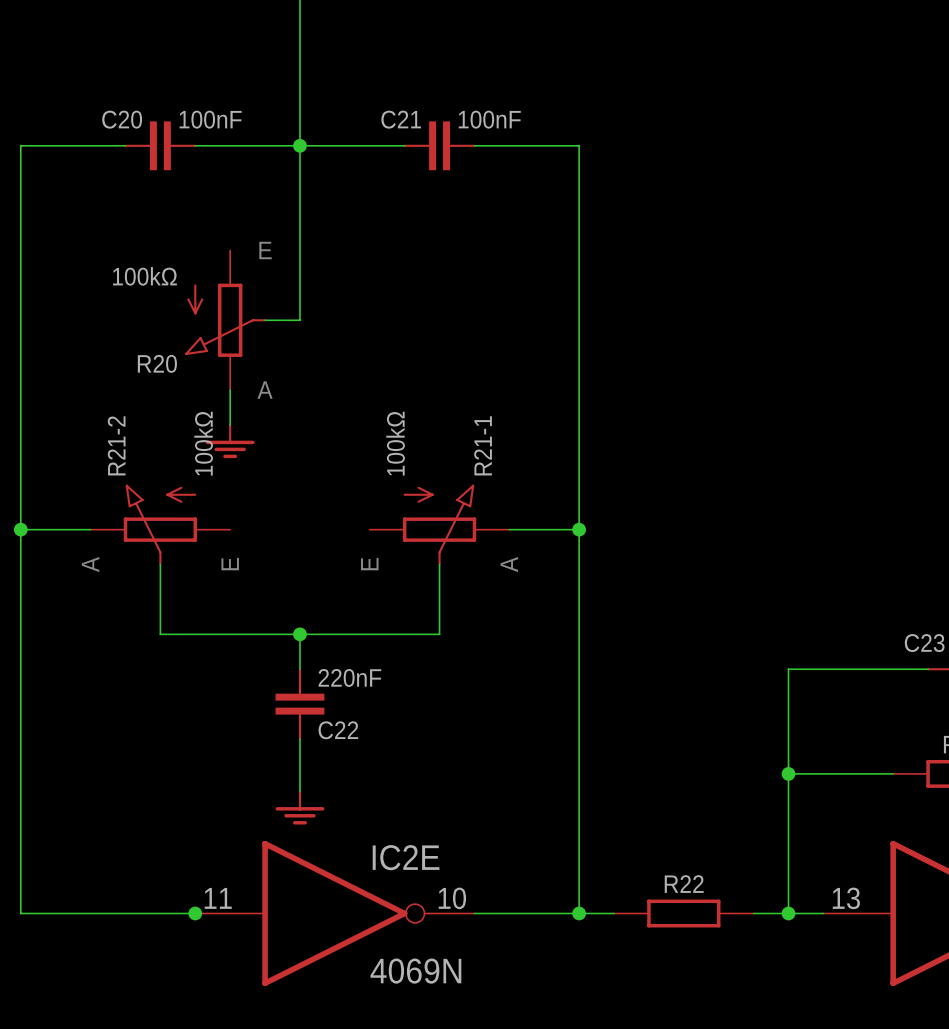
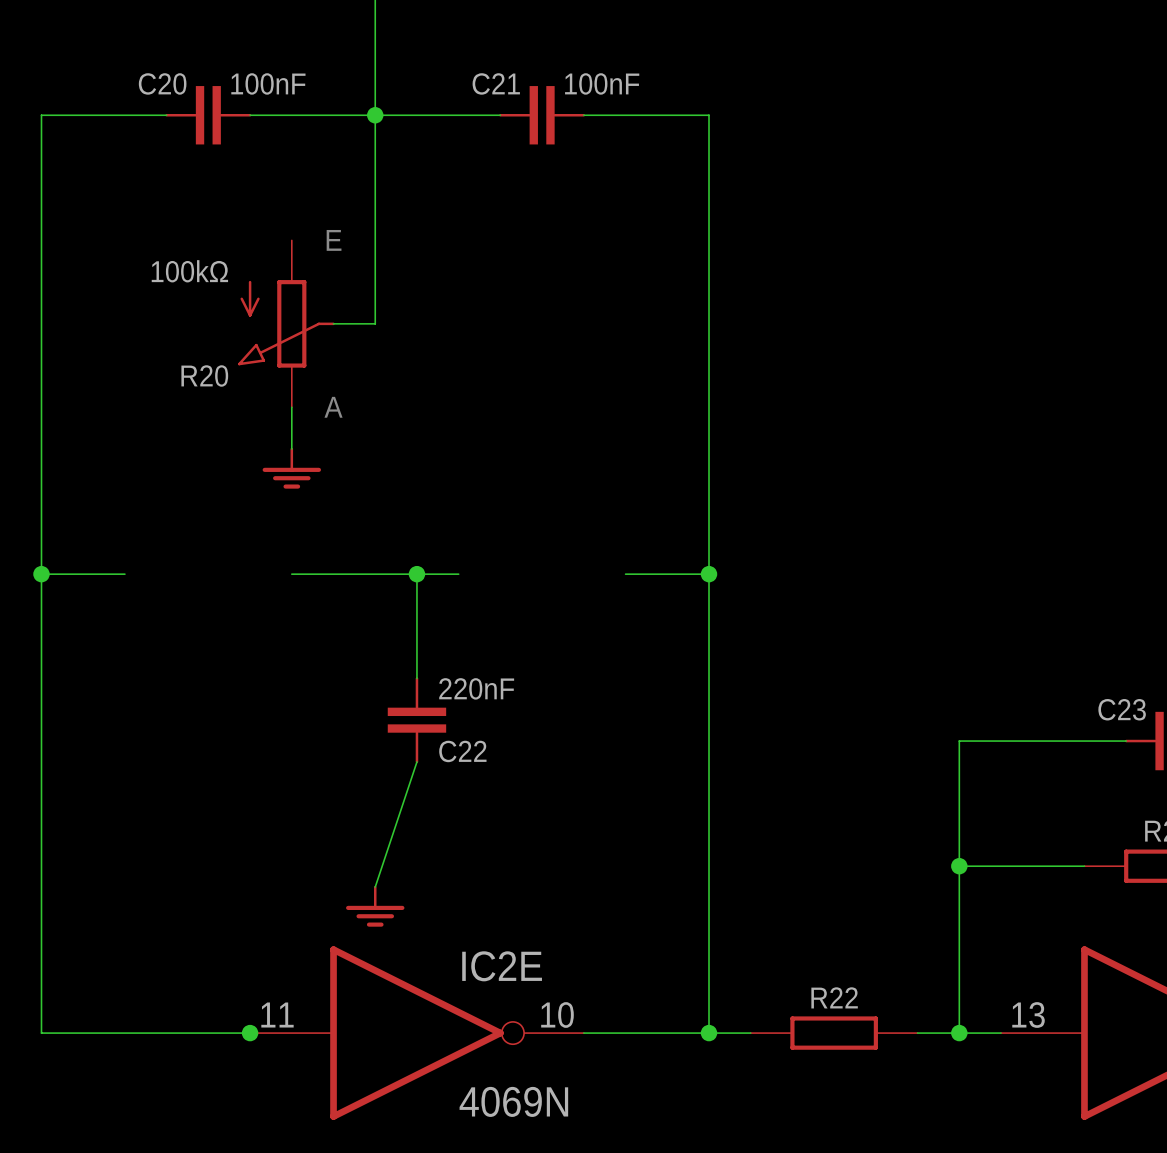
R21-2: 100kΩ (160, 525) -> none
R21-1: 100kΩ (439, 525) -> none
wire: none -> (291, 574) (458, 574)
wire: none -> (416, 574) (416, 678)
junction: none -> (416, 574)
wire: (160, 564) (160, 634) (439, 634) (439, 564) -> none
wire: (299, 634) (299, 669) -> none
junction: (299, 634) -> none
C22 position: (299, 704) -> (416, 720)
wire: (299, 739) (299, 791) -> (416, 761) (375, 887)

